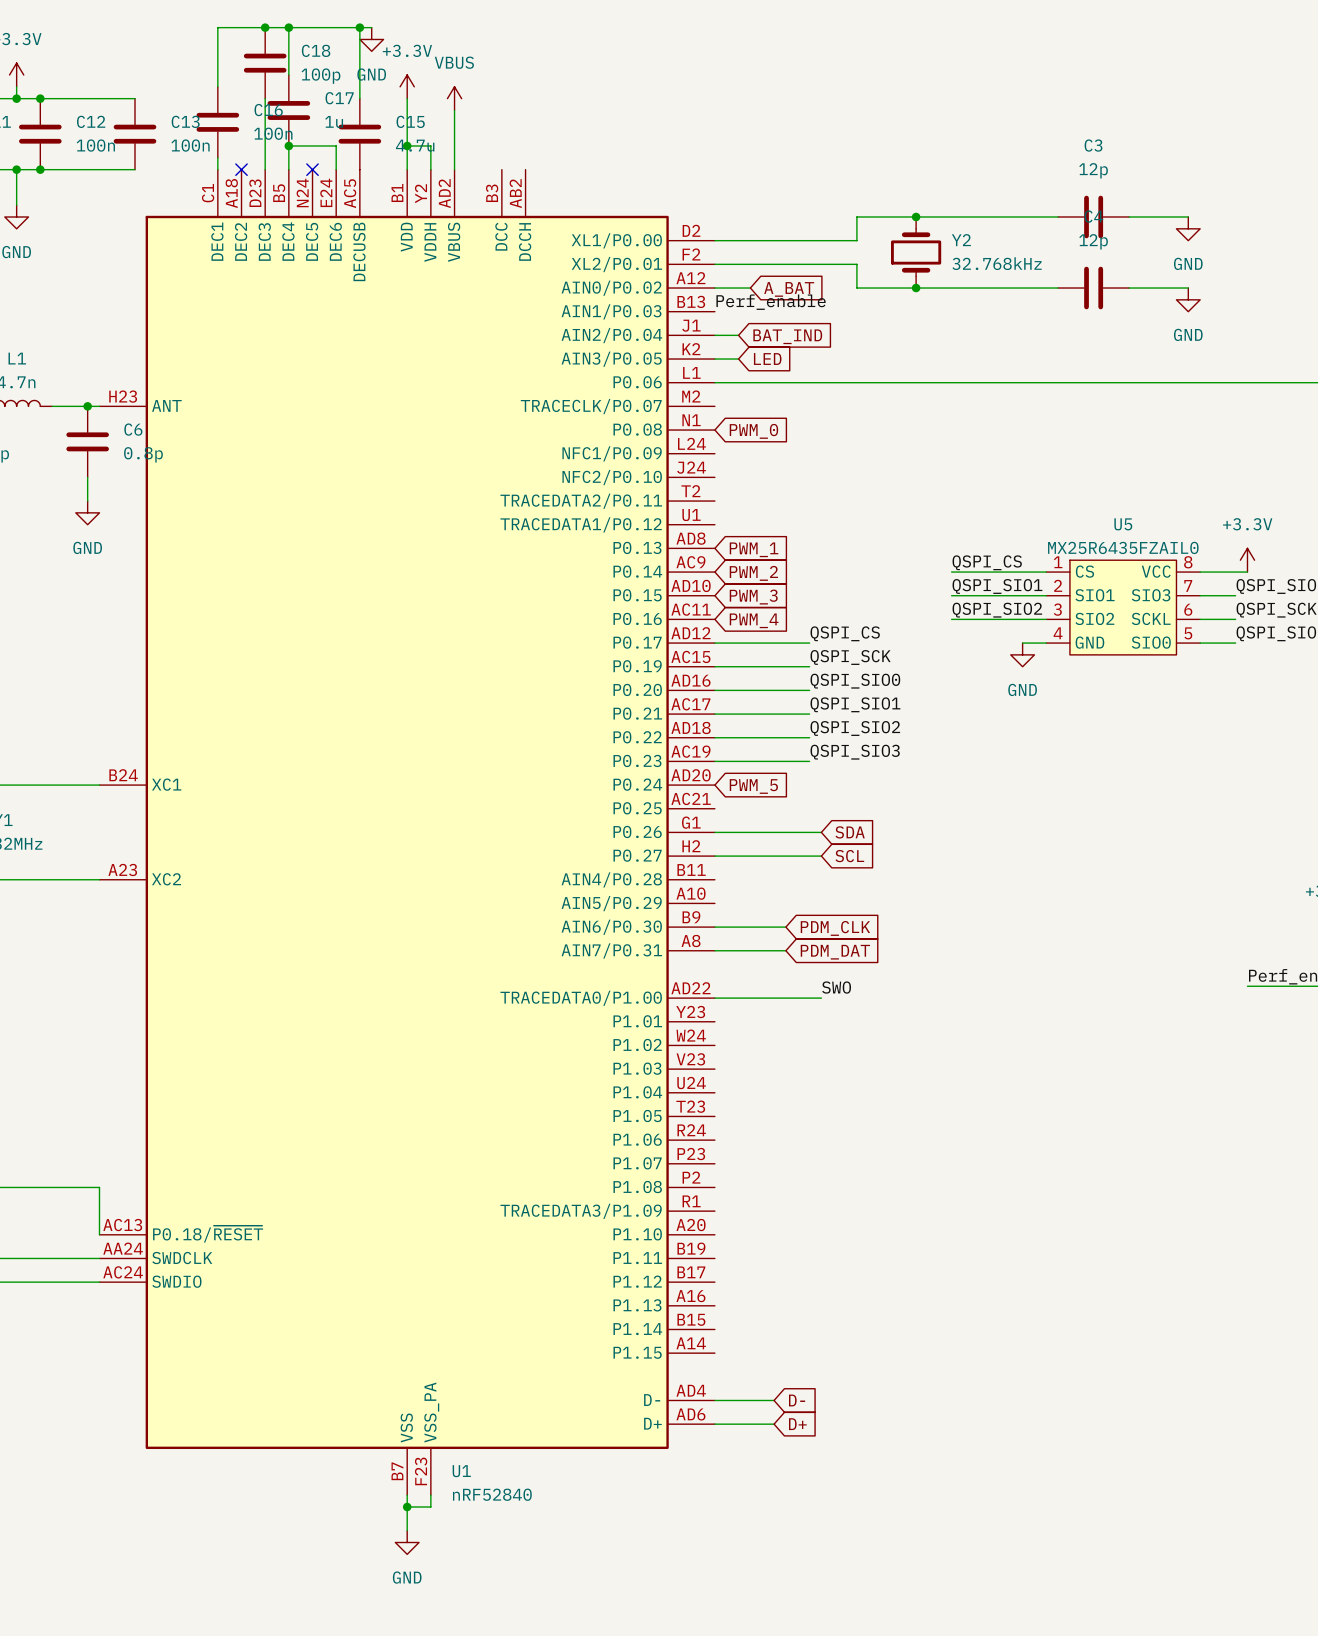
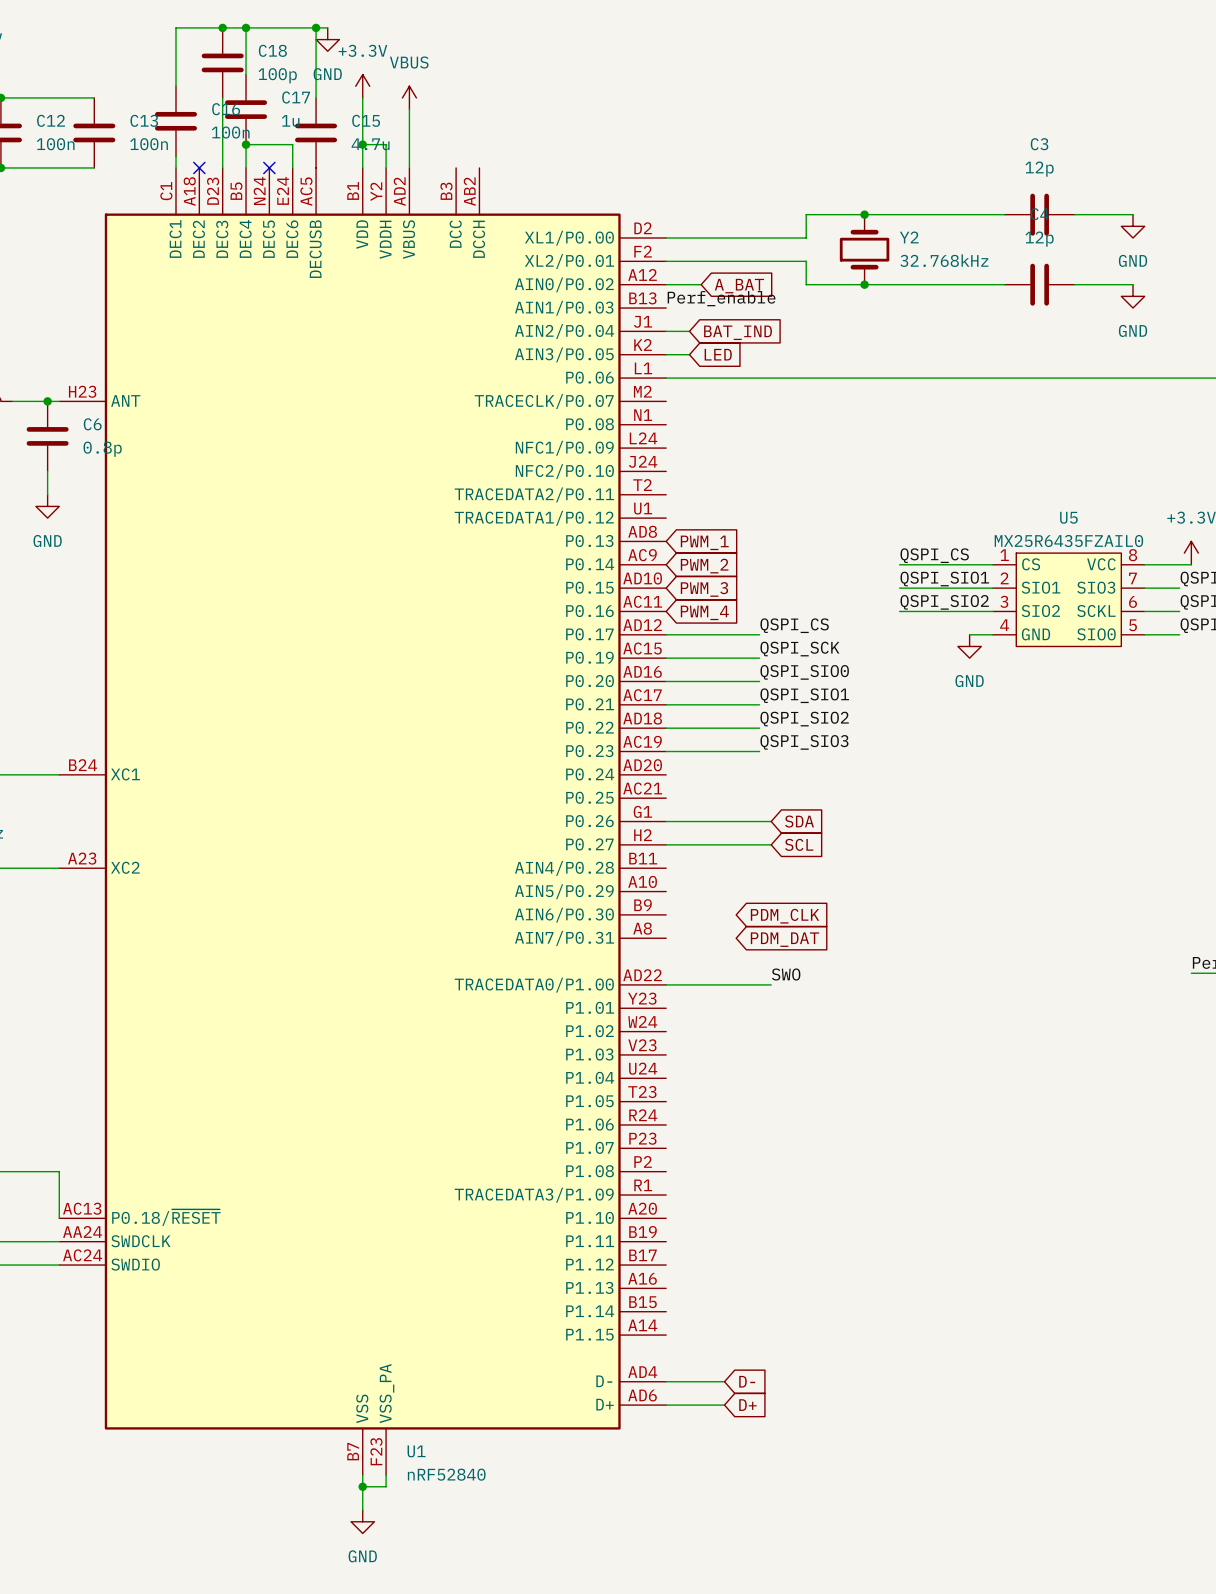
global label: PWM_0 (753, 431) -> none
global label: PWM_5 (753, 786) -> none
wire: (714, 927) (785, 927) -> none
wire: (714, 950) (785, 950) -> none

